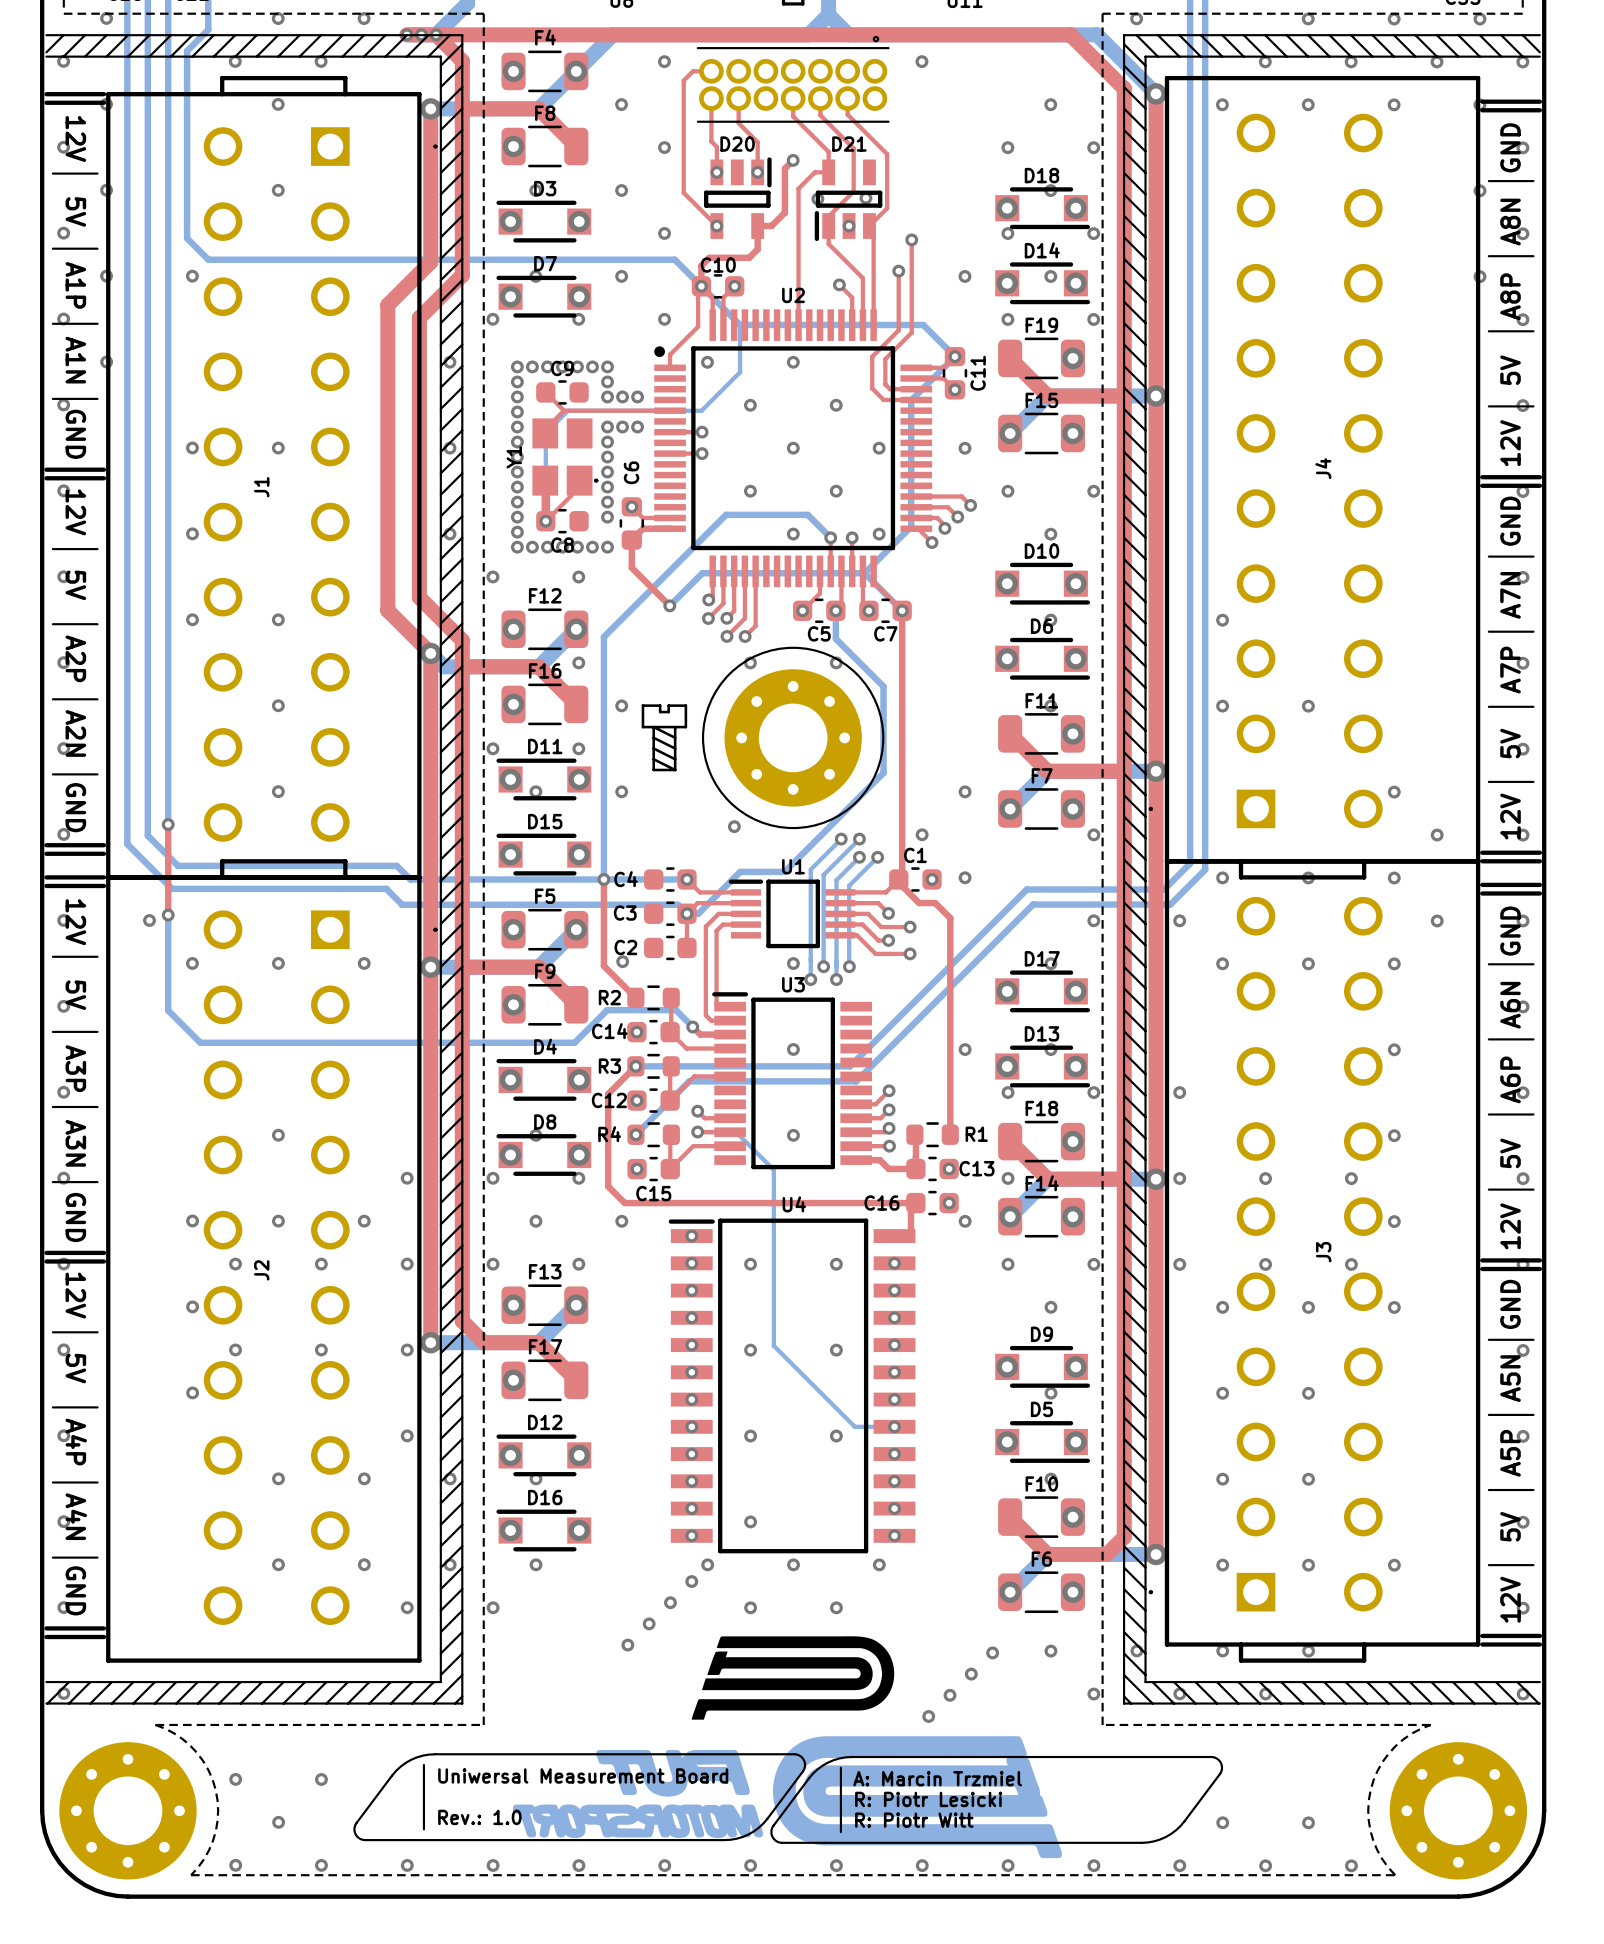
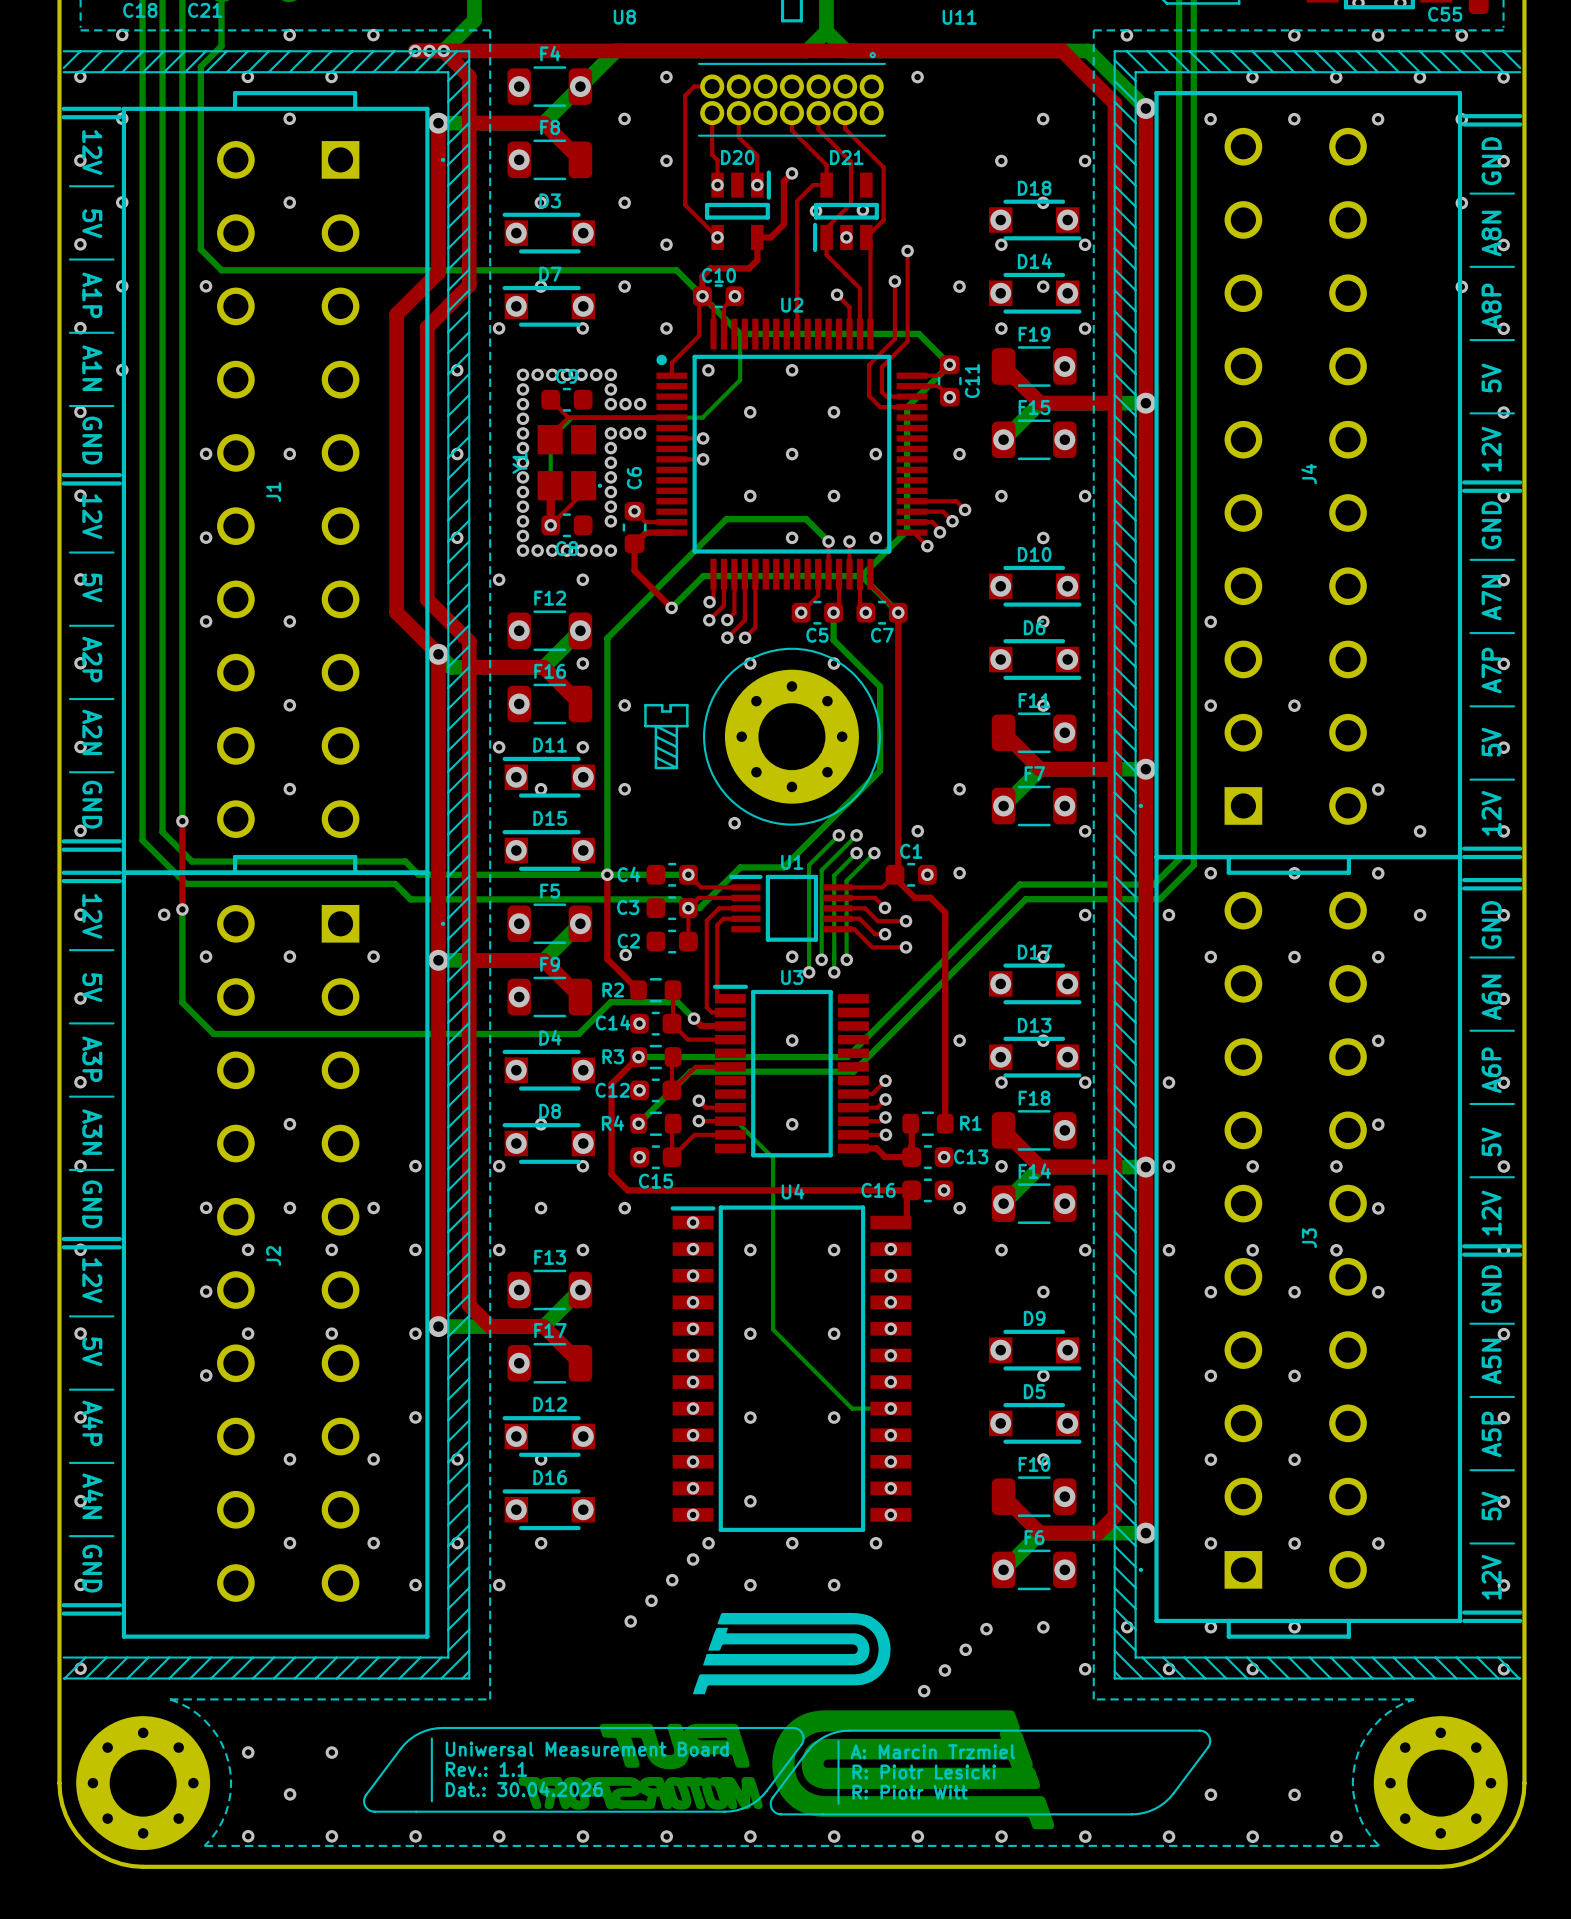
text: none -> Rev.: 1.1 (486, 1769)
text: Rev.: 1.0 (479, 1817) -> Dat.: 30.04.2026 (524, 1789)

